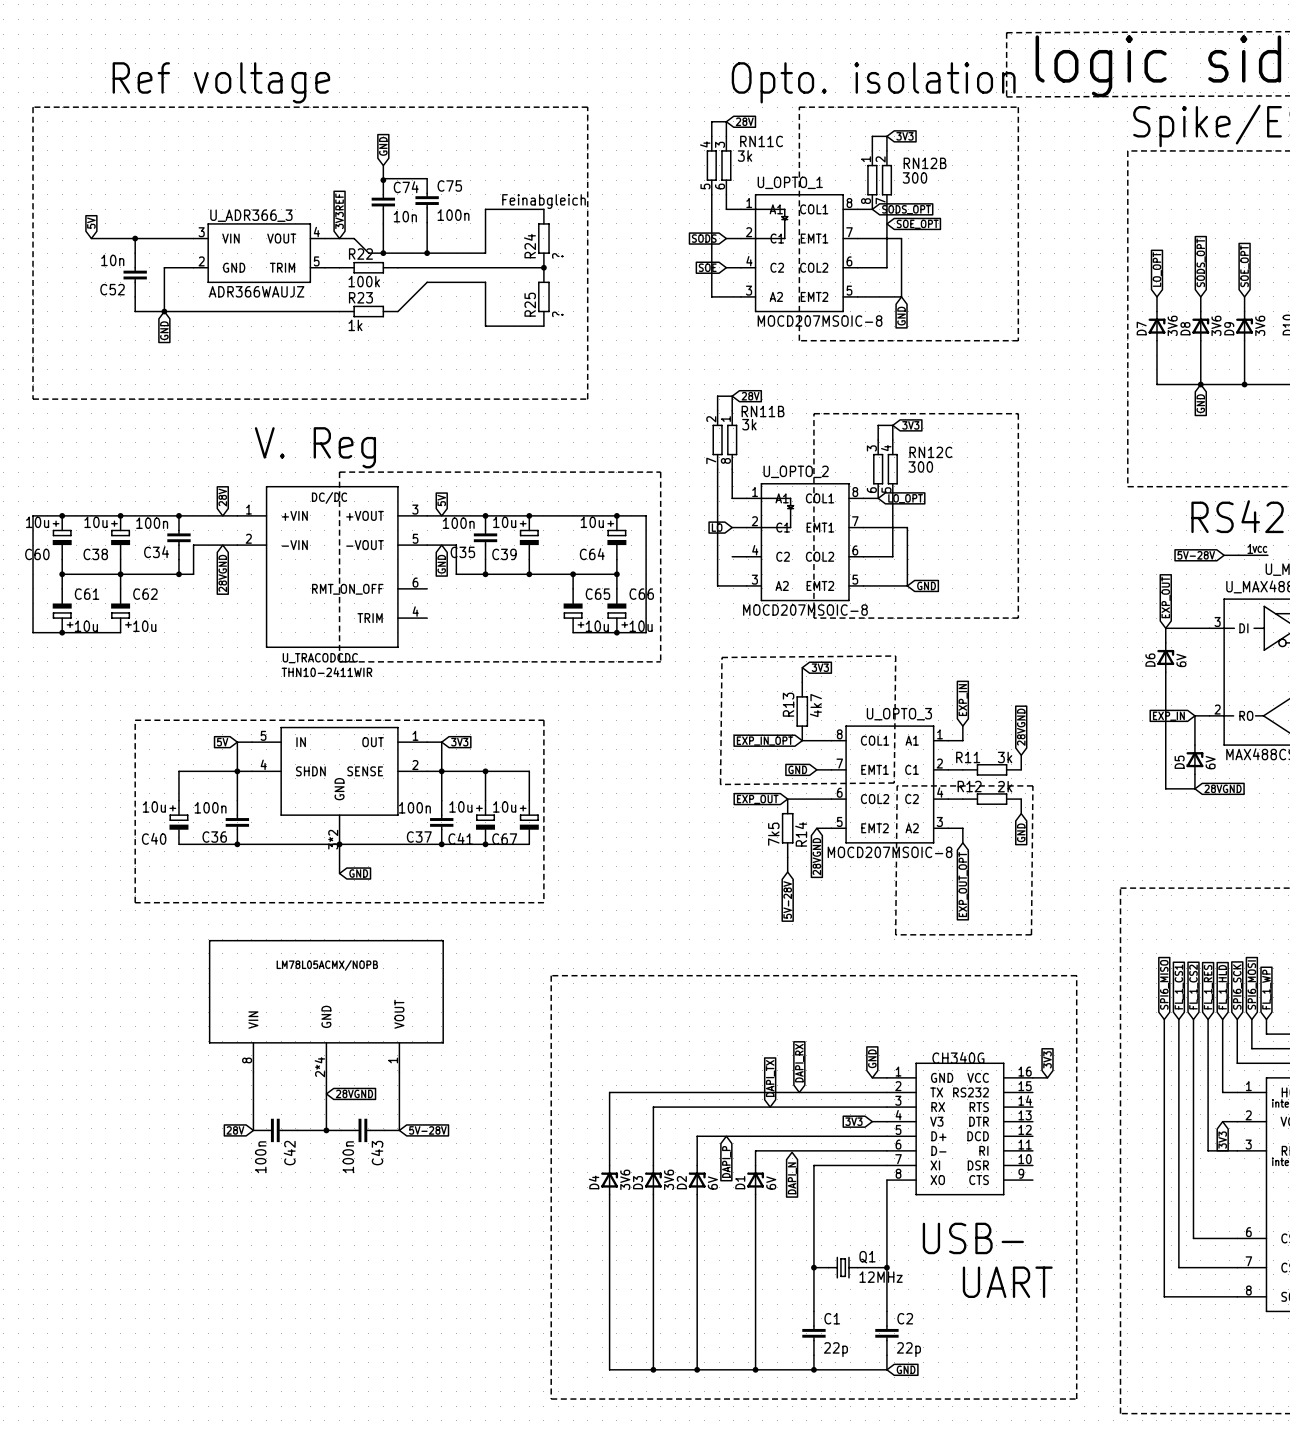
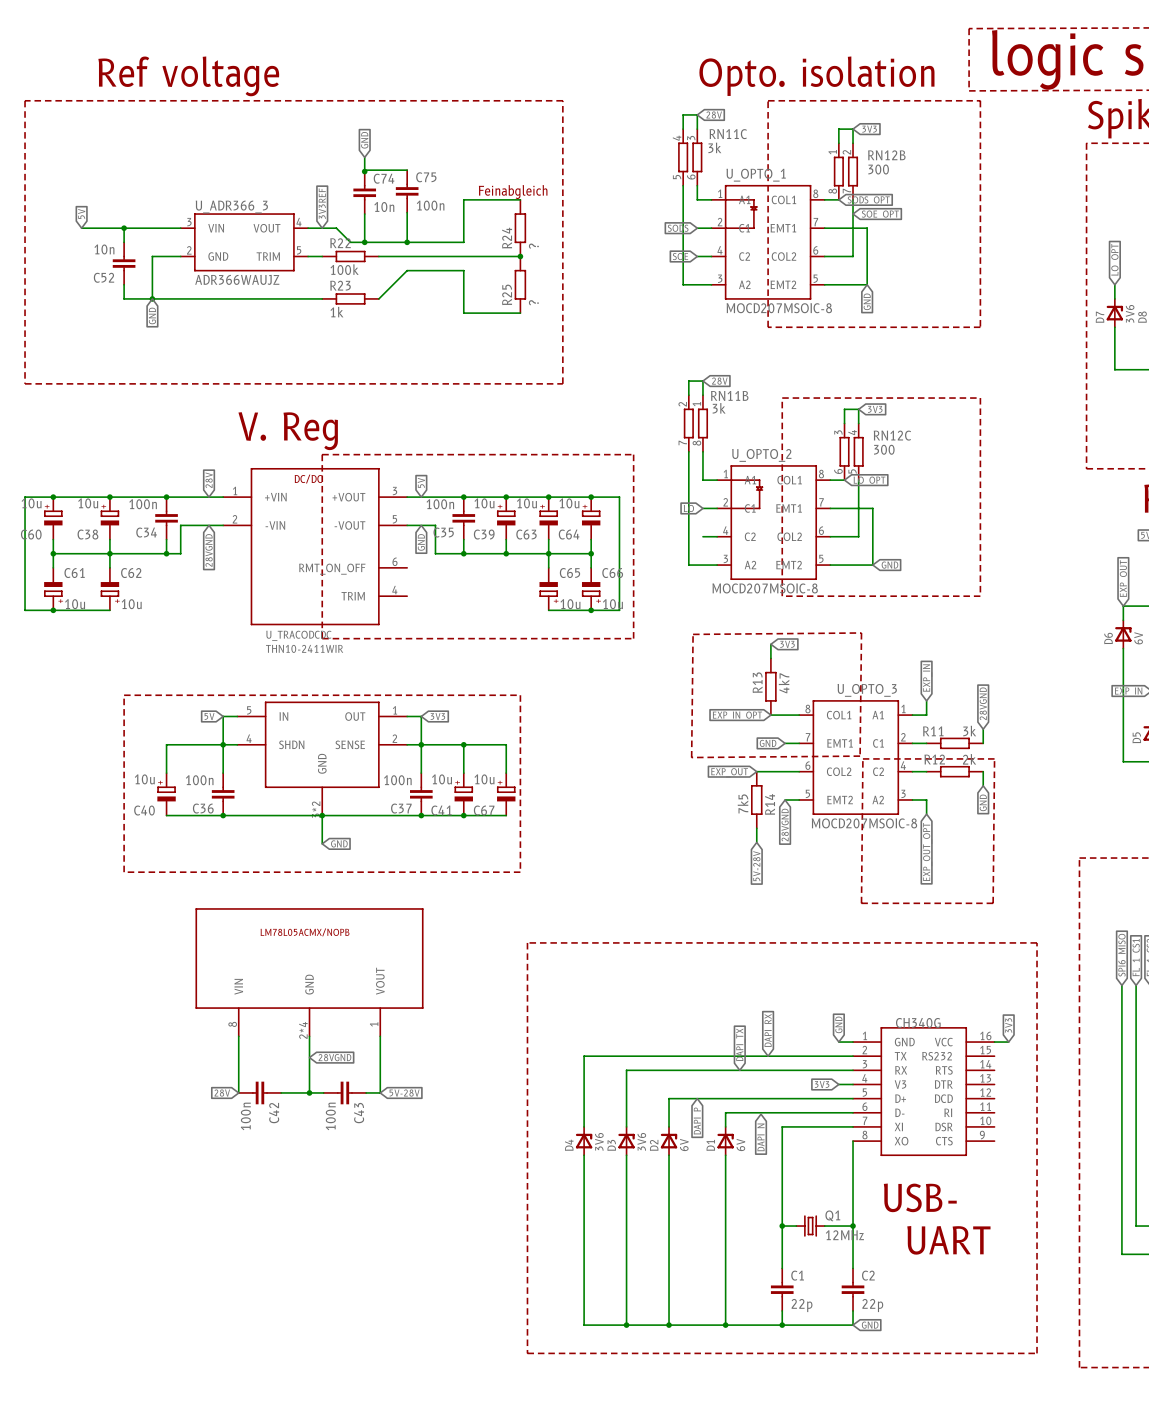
junction: none -> (548, 497)
C63: none -> 10u (548, 518)
wire: none -> (548, 539) (548, 553)

